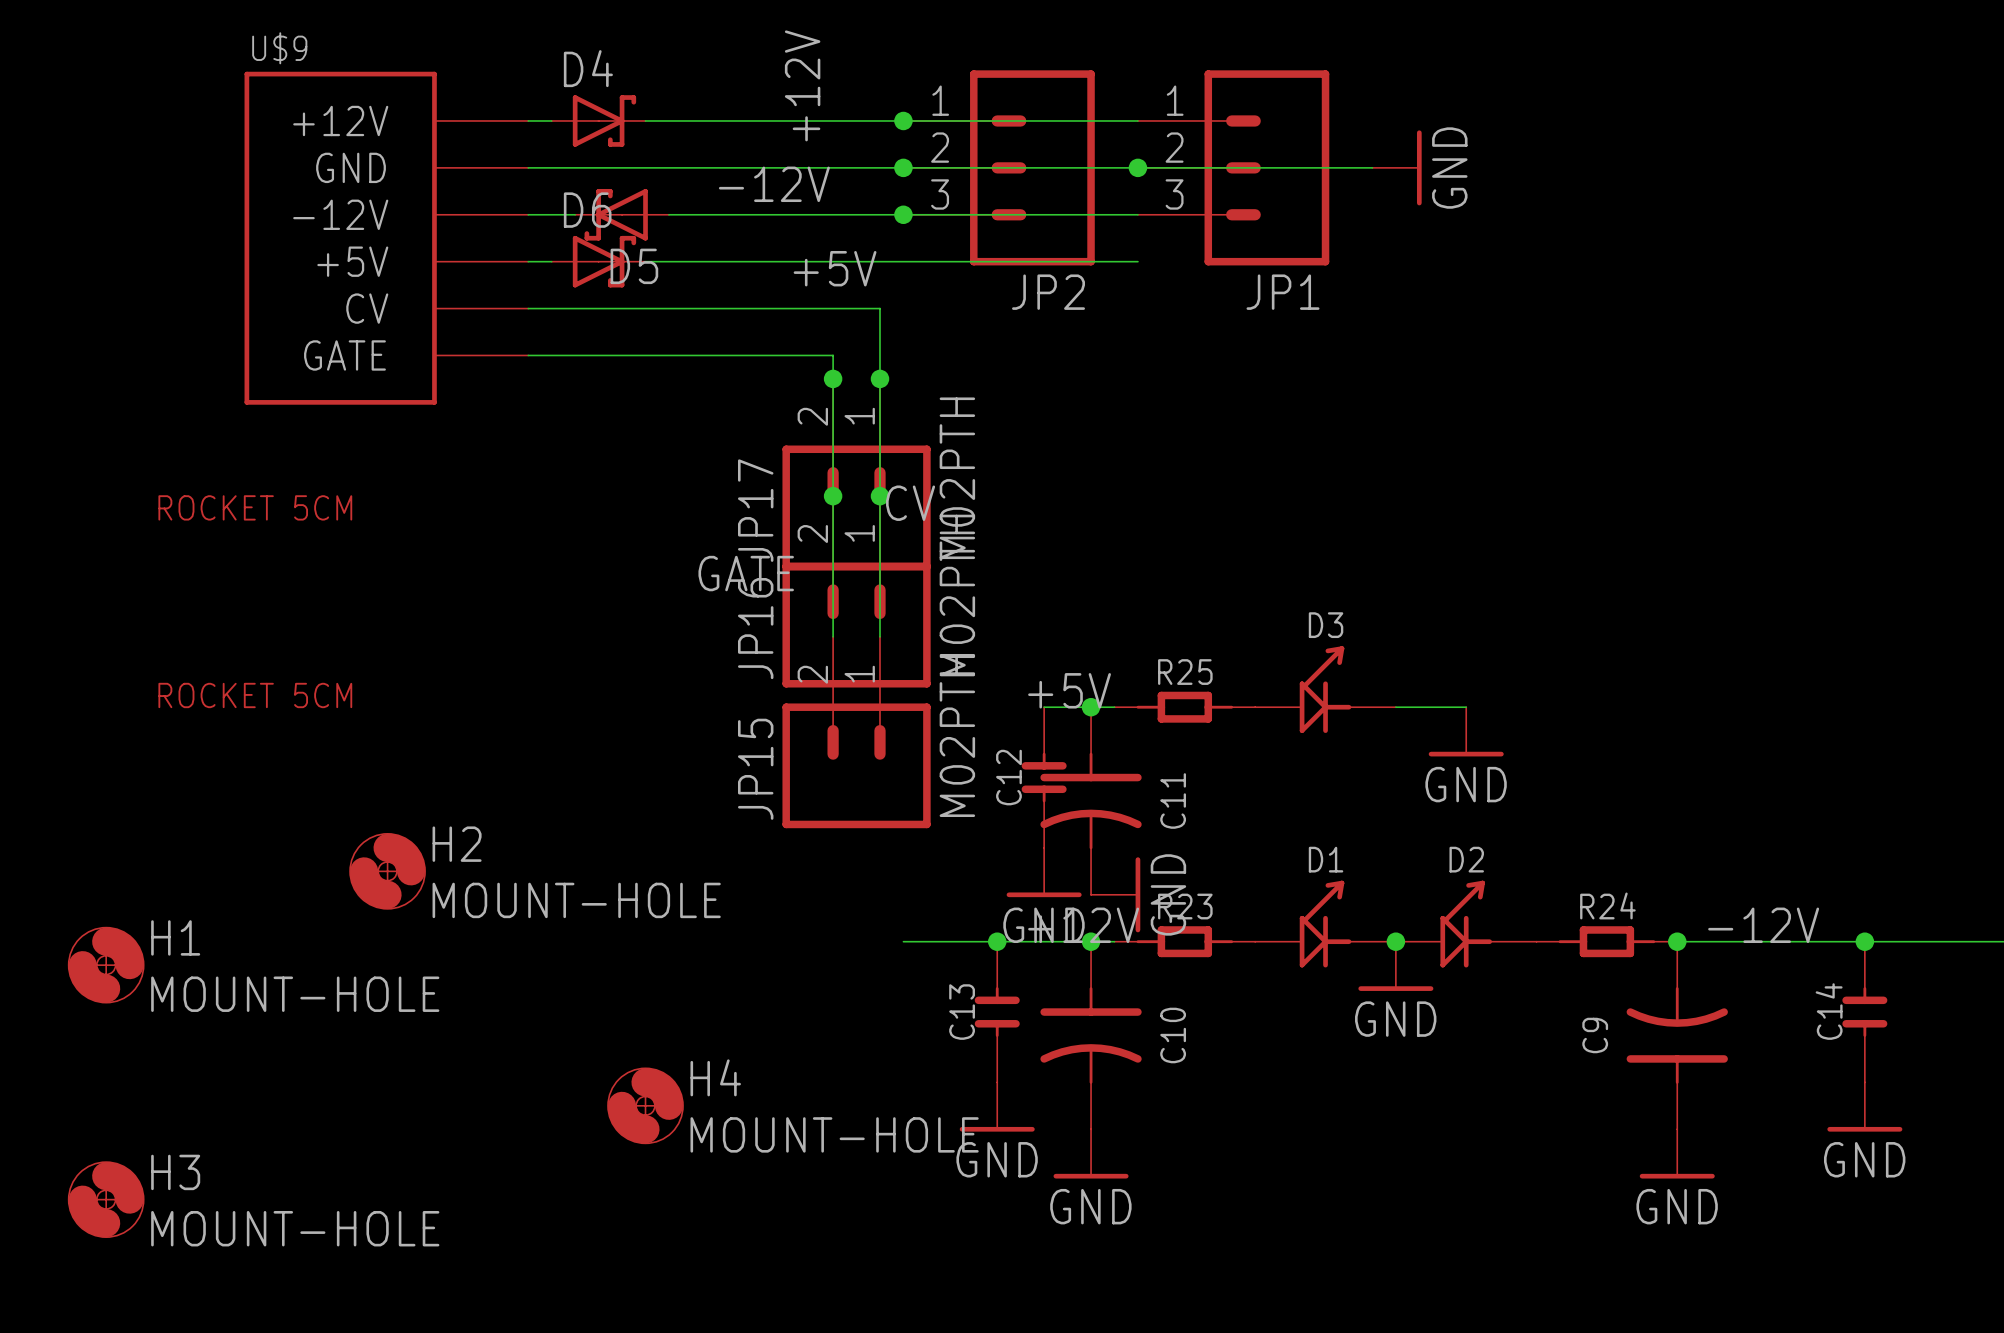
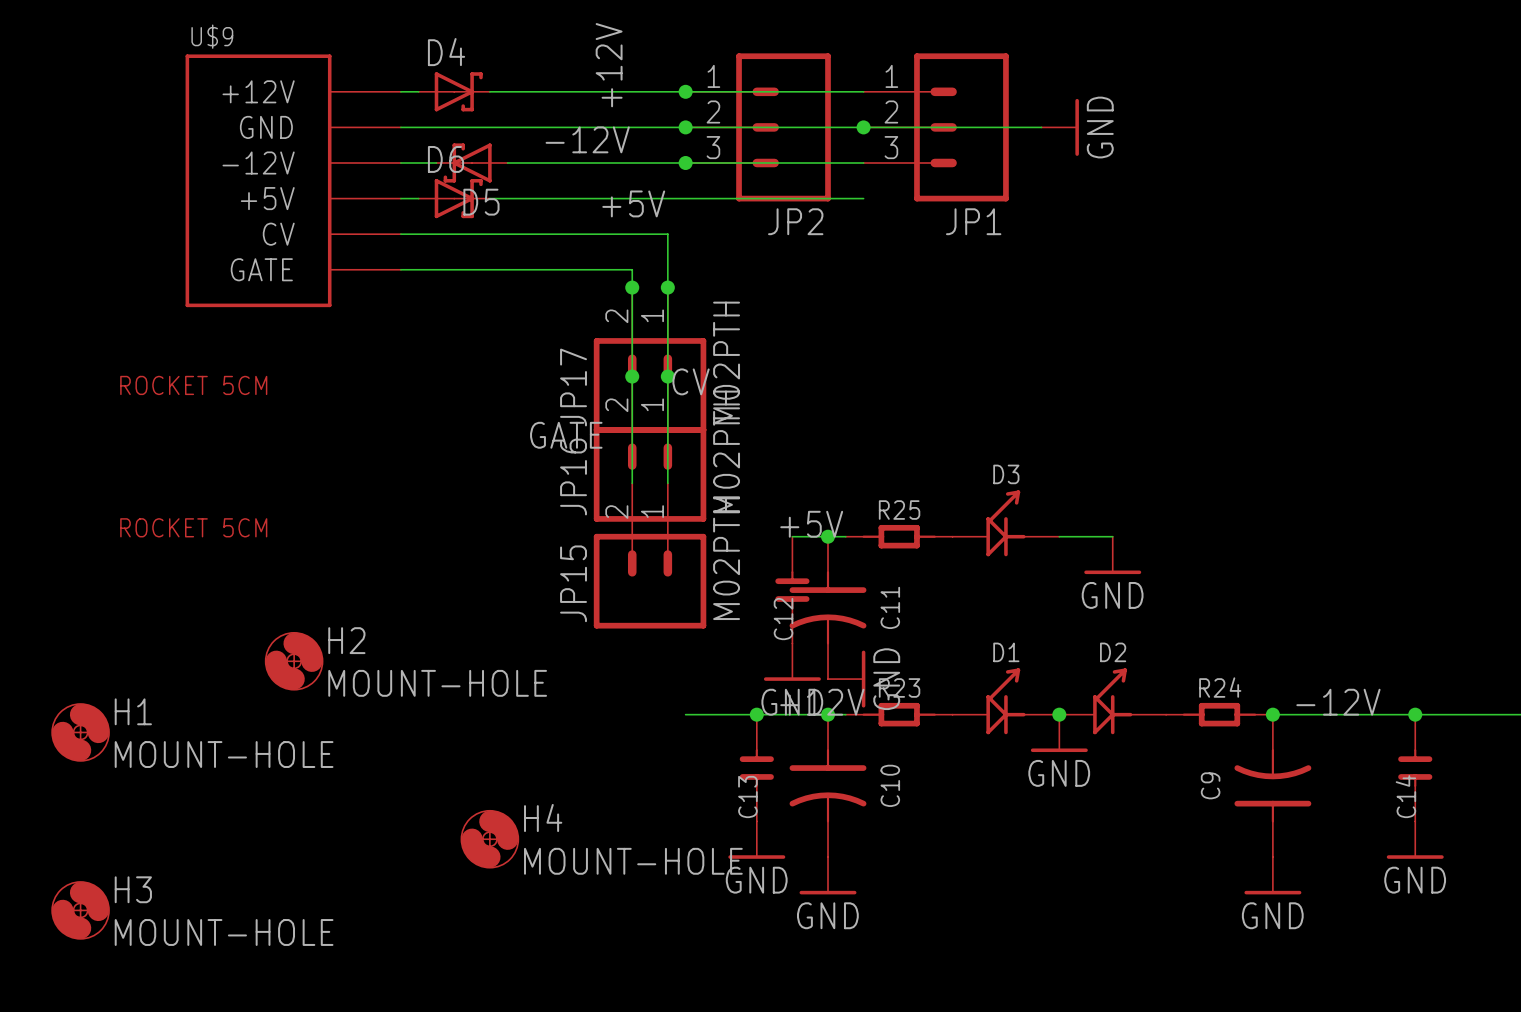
C12 name position: C12 (1008, 777) -> C12 (783, 619)
C14 name position: C14 (1829, 1011) -> C14 (1405, 796)
C13 name position: C13 (962, 1012) -> C13 (747, 797)

